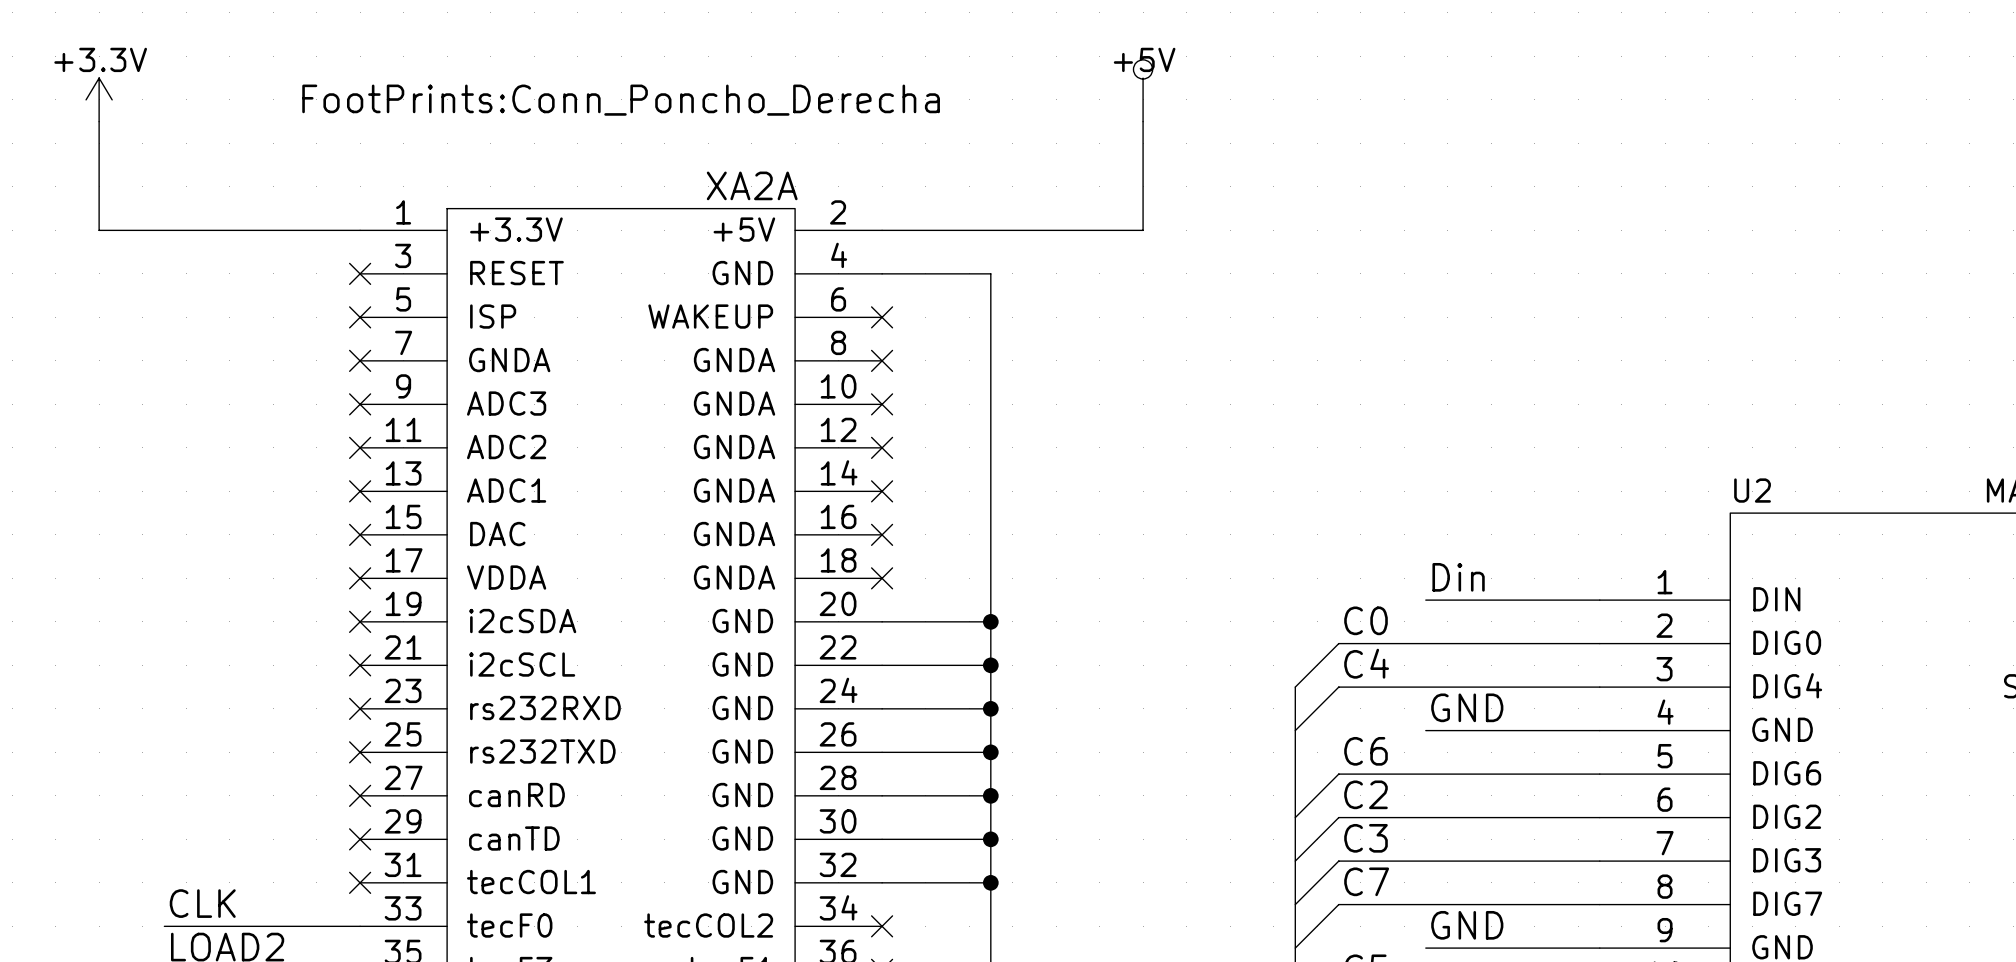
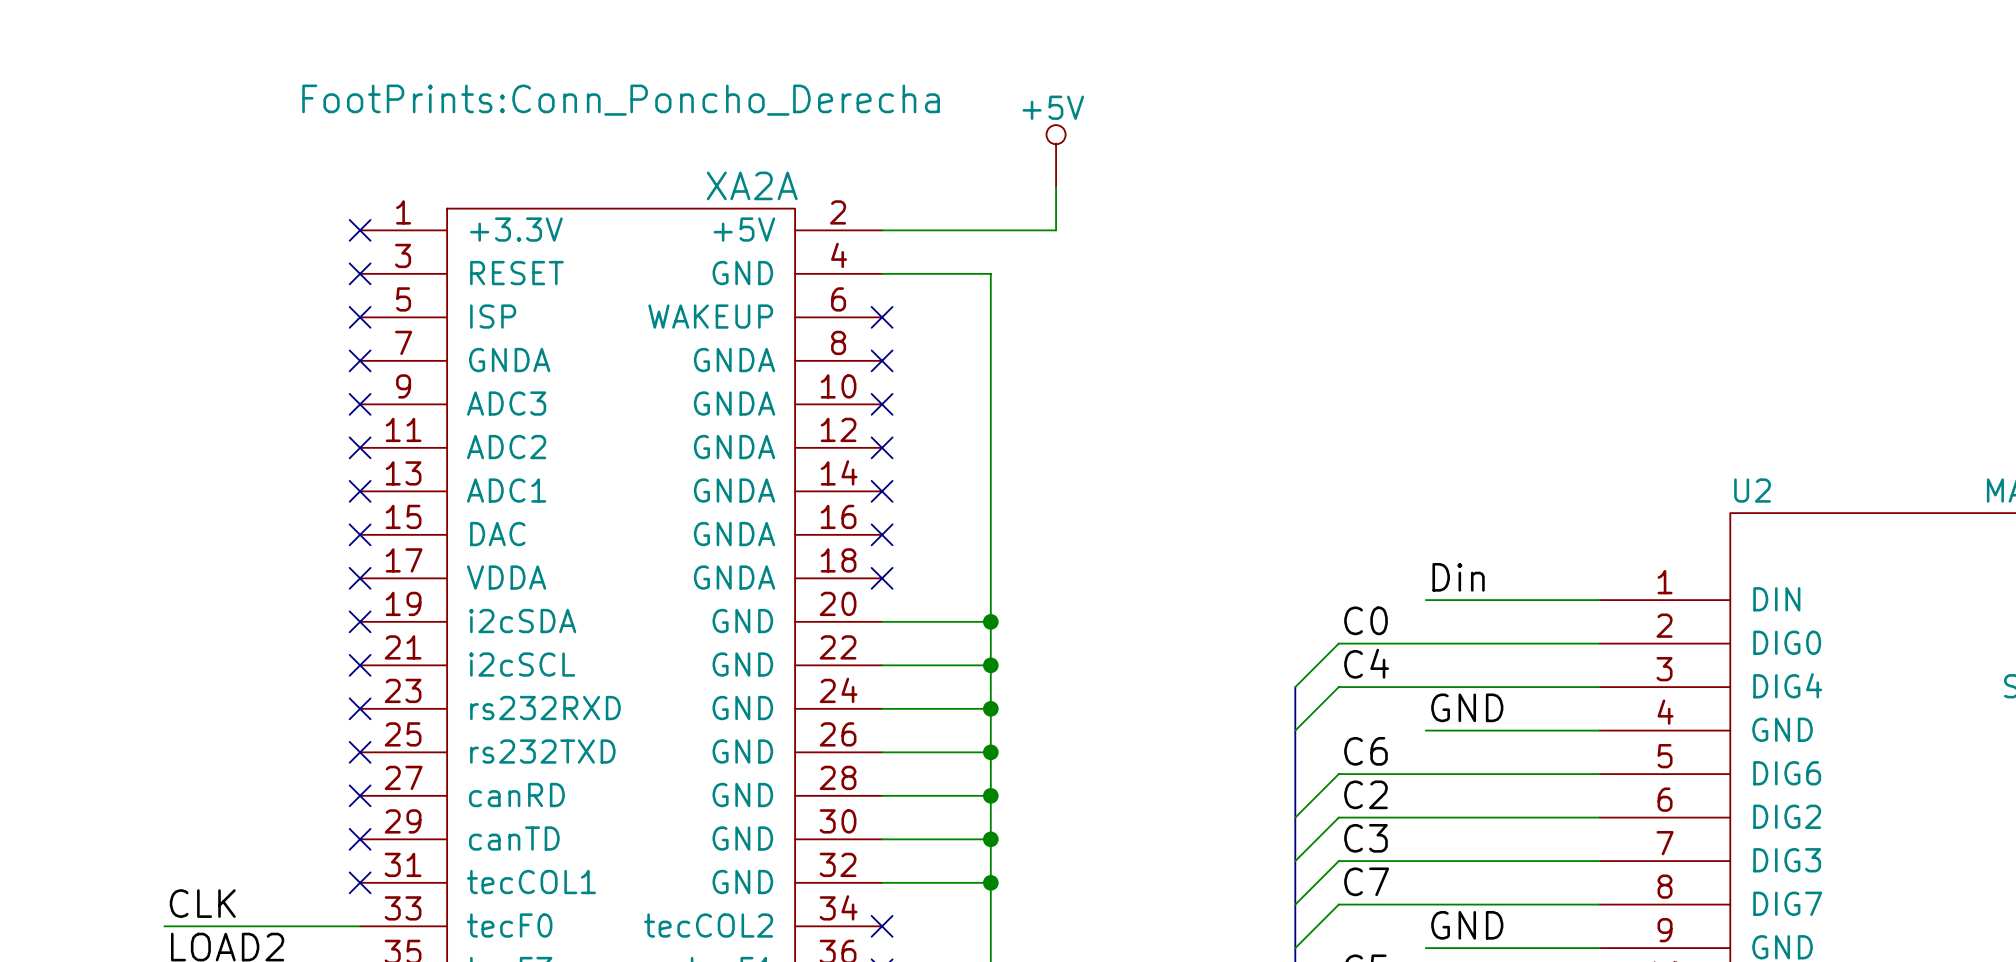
power symbol text position: +5V (1144, 59) -> +5V (1053, 107)
power symbol position: +5V (1143, 90) -> +5V (1056, 155)
power symbol: +3.3V (99, 99) -> none
wire: (99, 121) (99, 230) (360, 230) -> none
wire: (1143, 121) (1143, 230) (1056, 230) -> (1056, 186) (1056, 230)
no-connect mark: none -> (360, 230)

